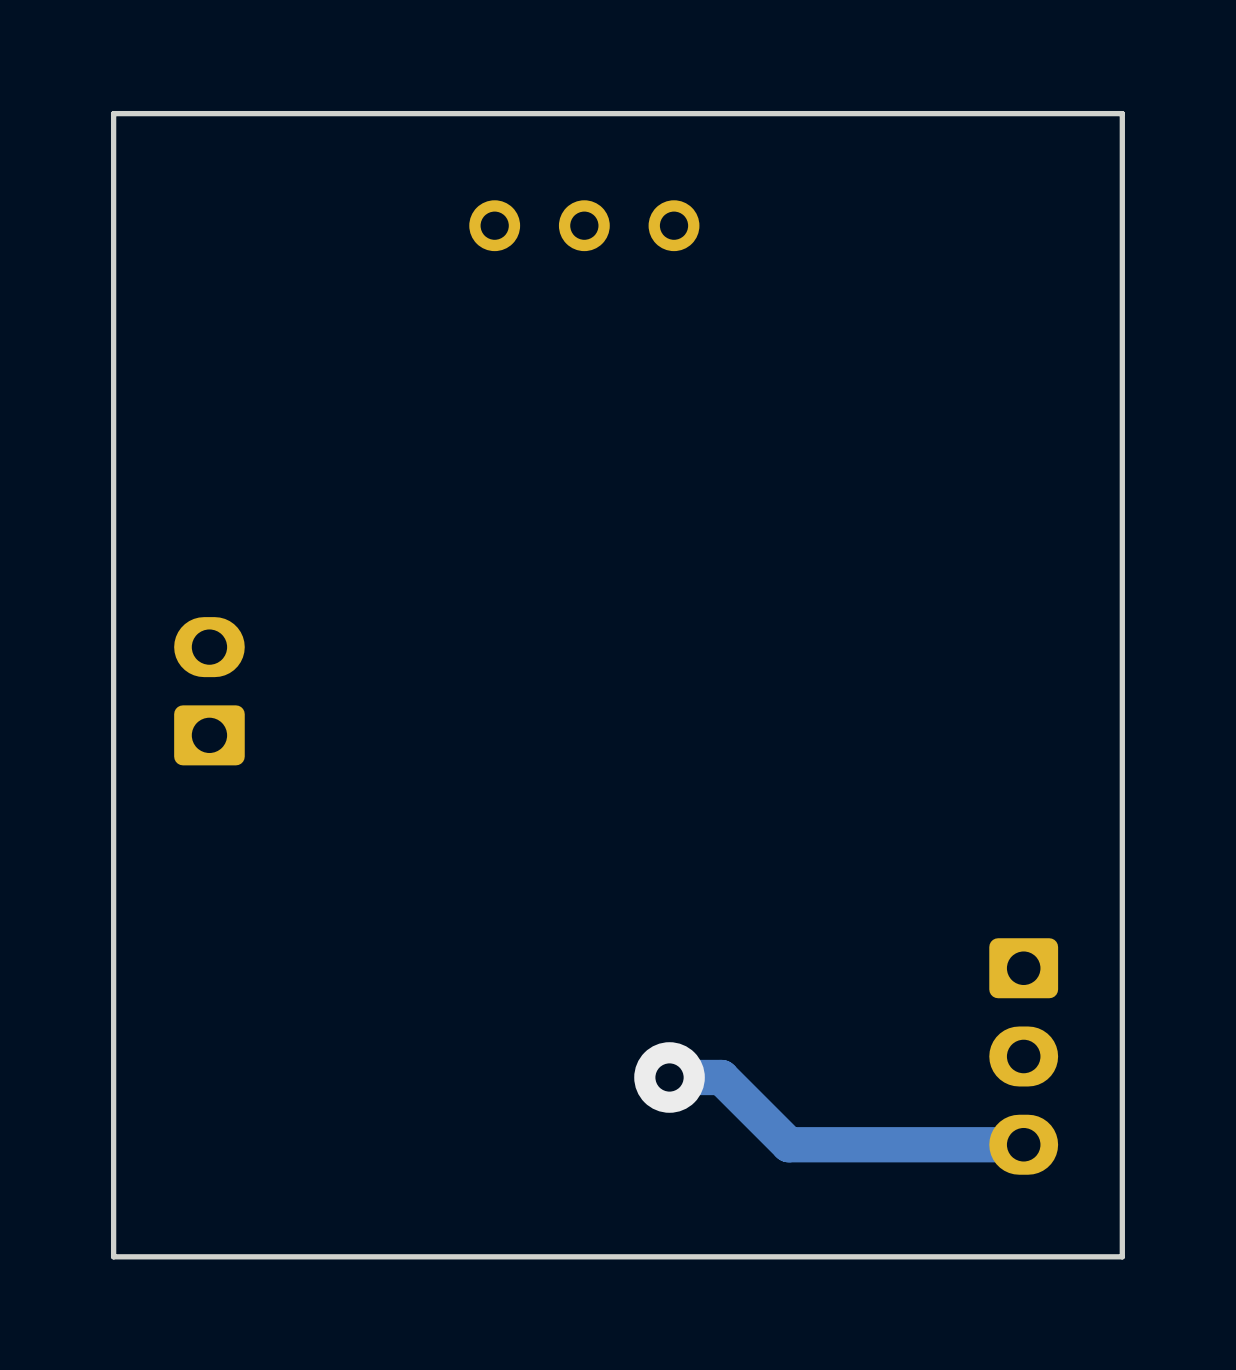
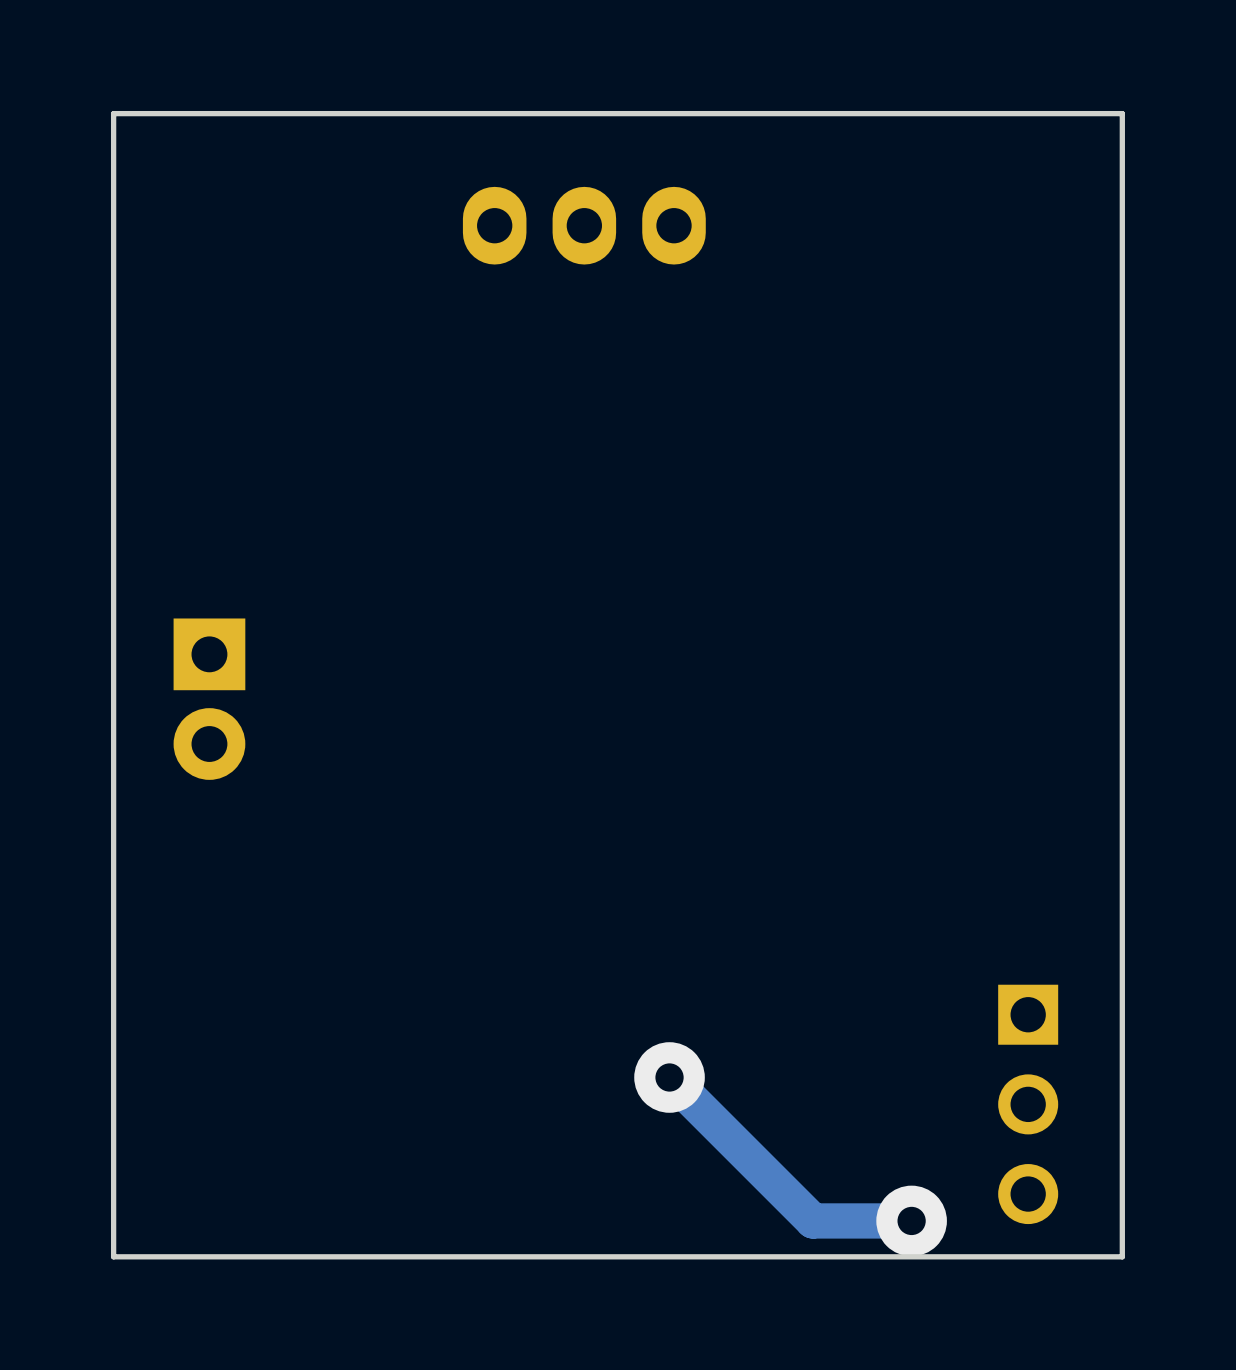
part footprint: [469, 200, 700, 252] -> [462, 186, 706, 265]
part footprint: [174, 617, 245, 766] -> [173, 618, 246, 780]
part: (1023, 1056) -> none
track: (669, 1077) (721, 1077) (788, 1144) (1023, 1144) -> (669, 1077) (812, 1220) (911, 1220)
part: none -> (1028, 1104)
via: none -> (911, 1220)

